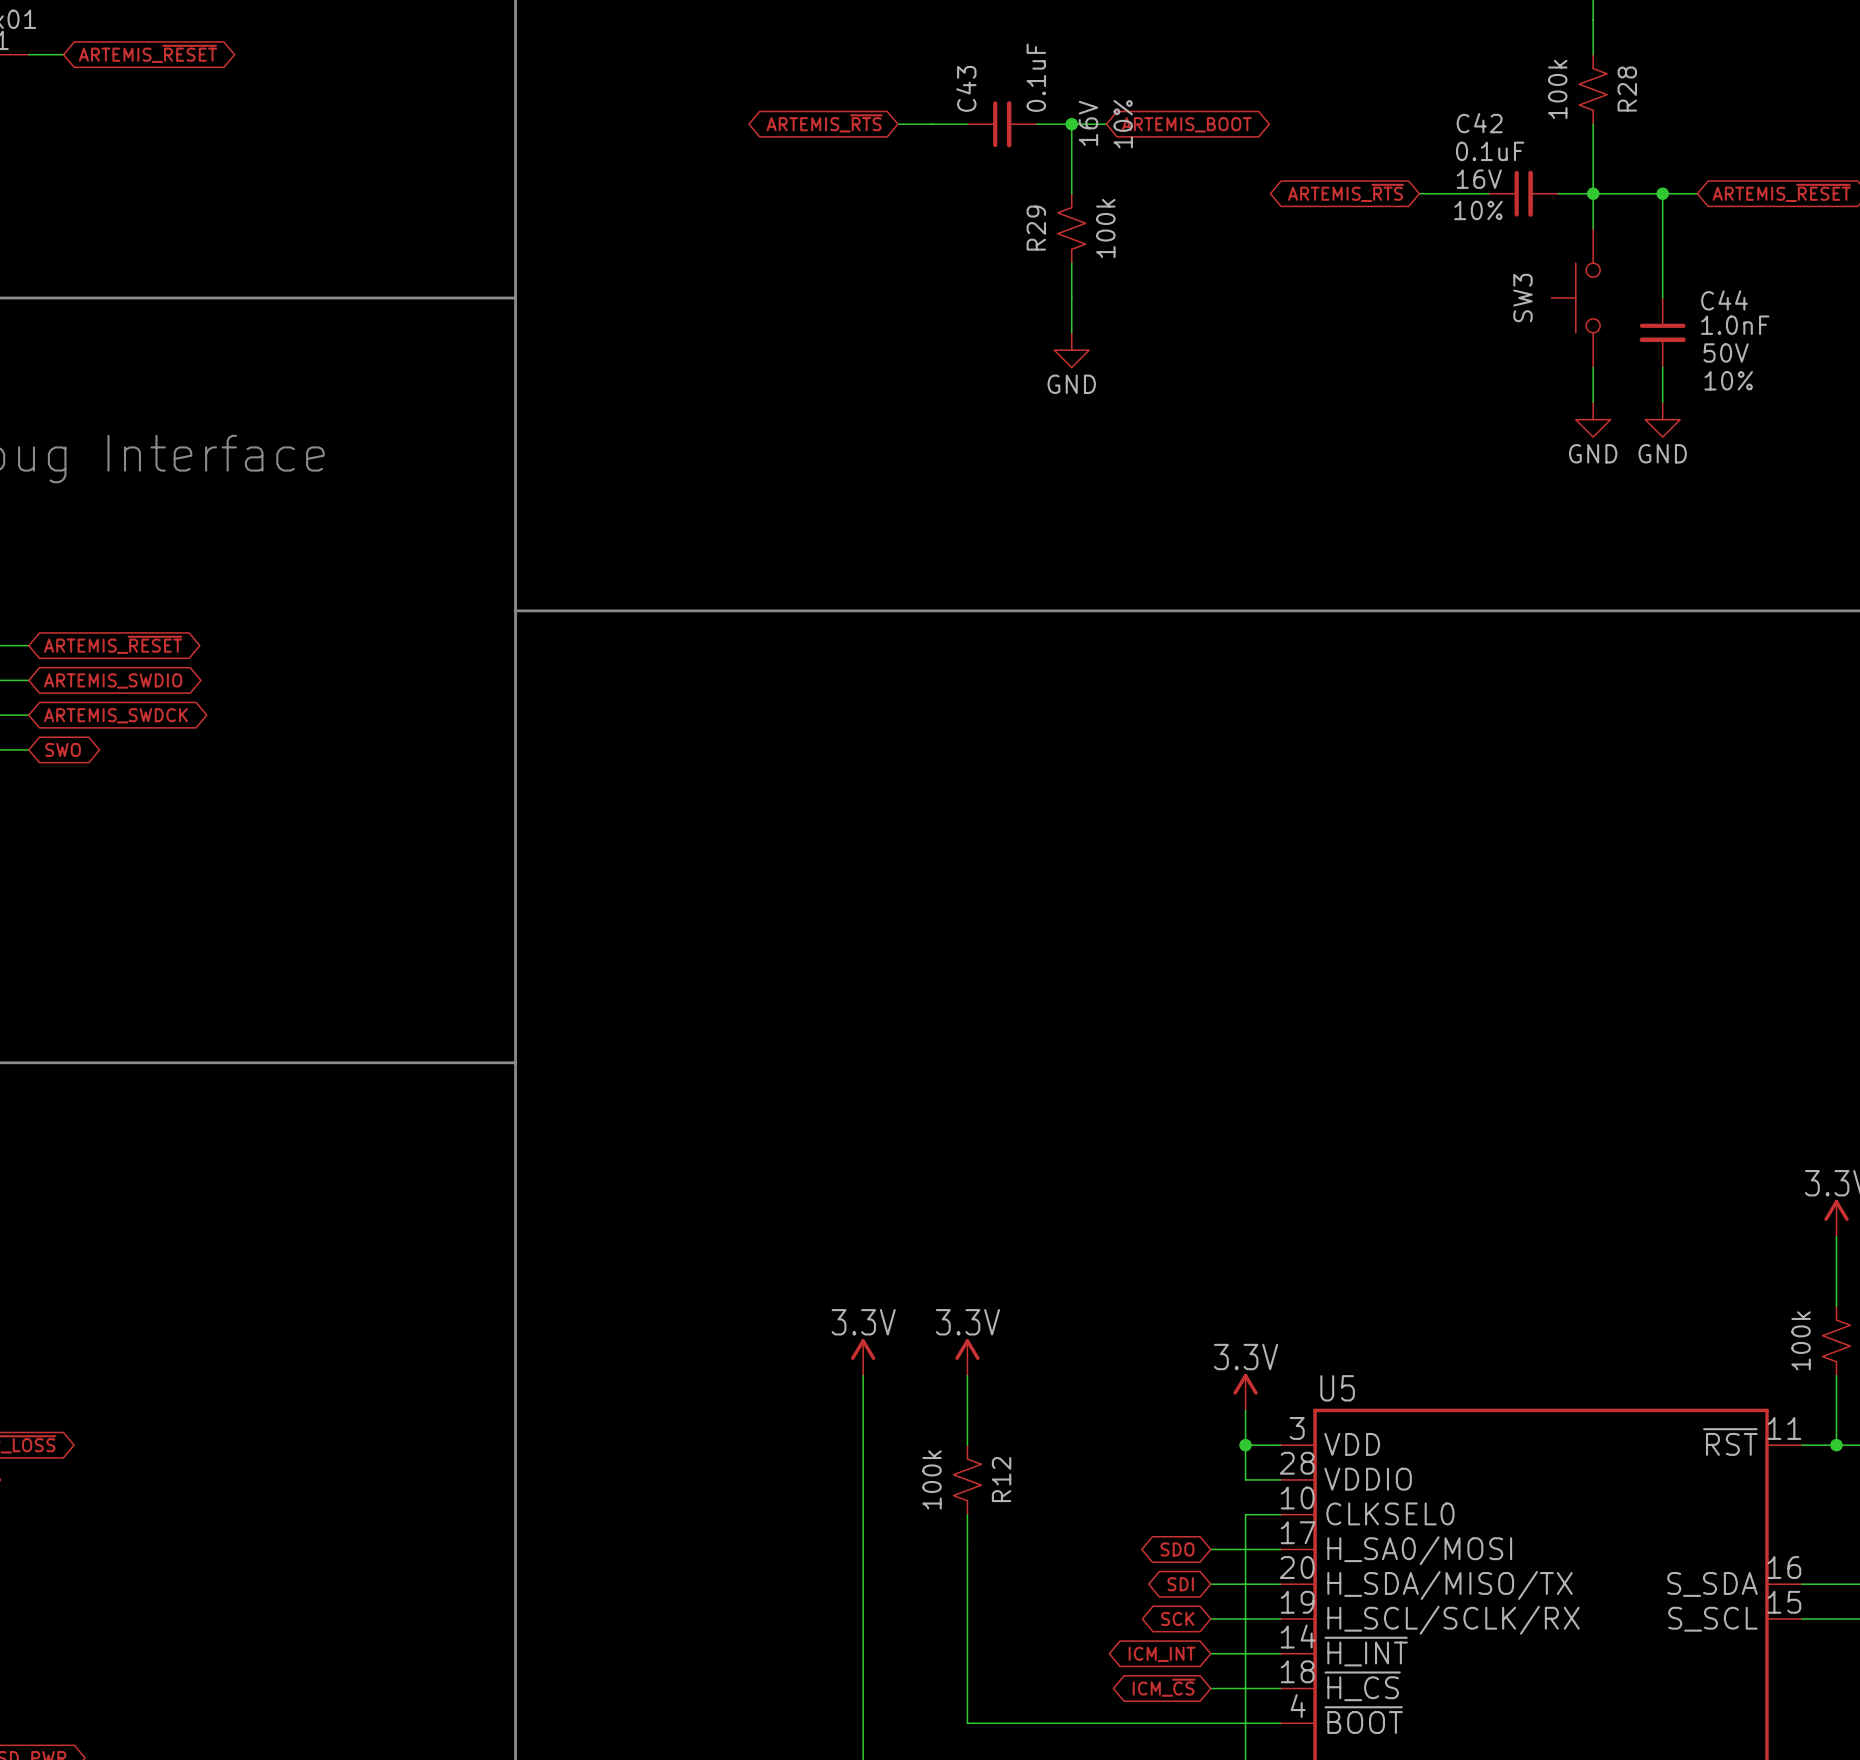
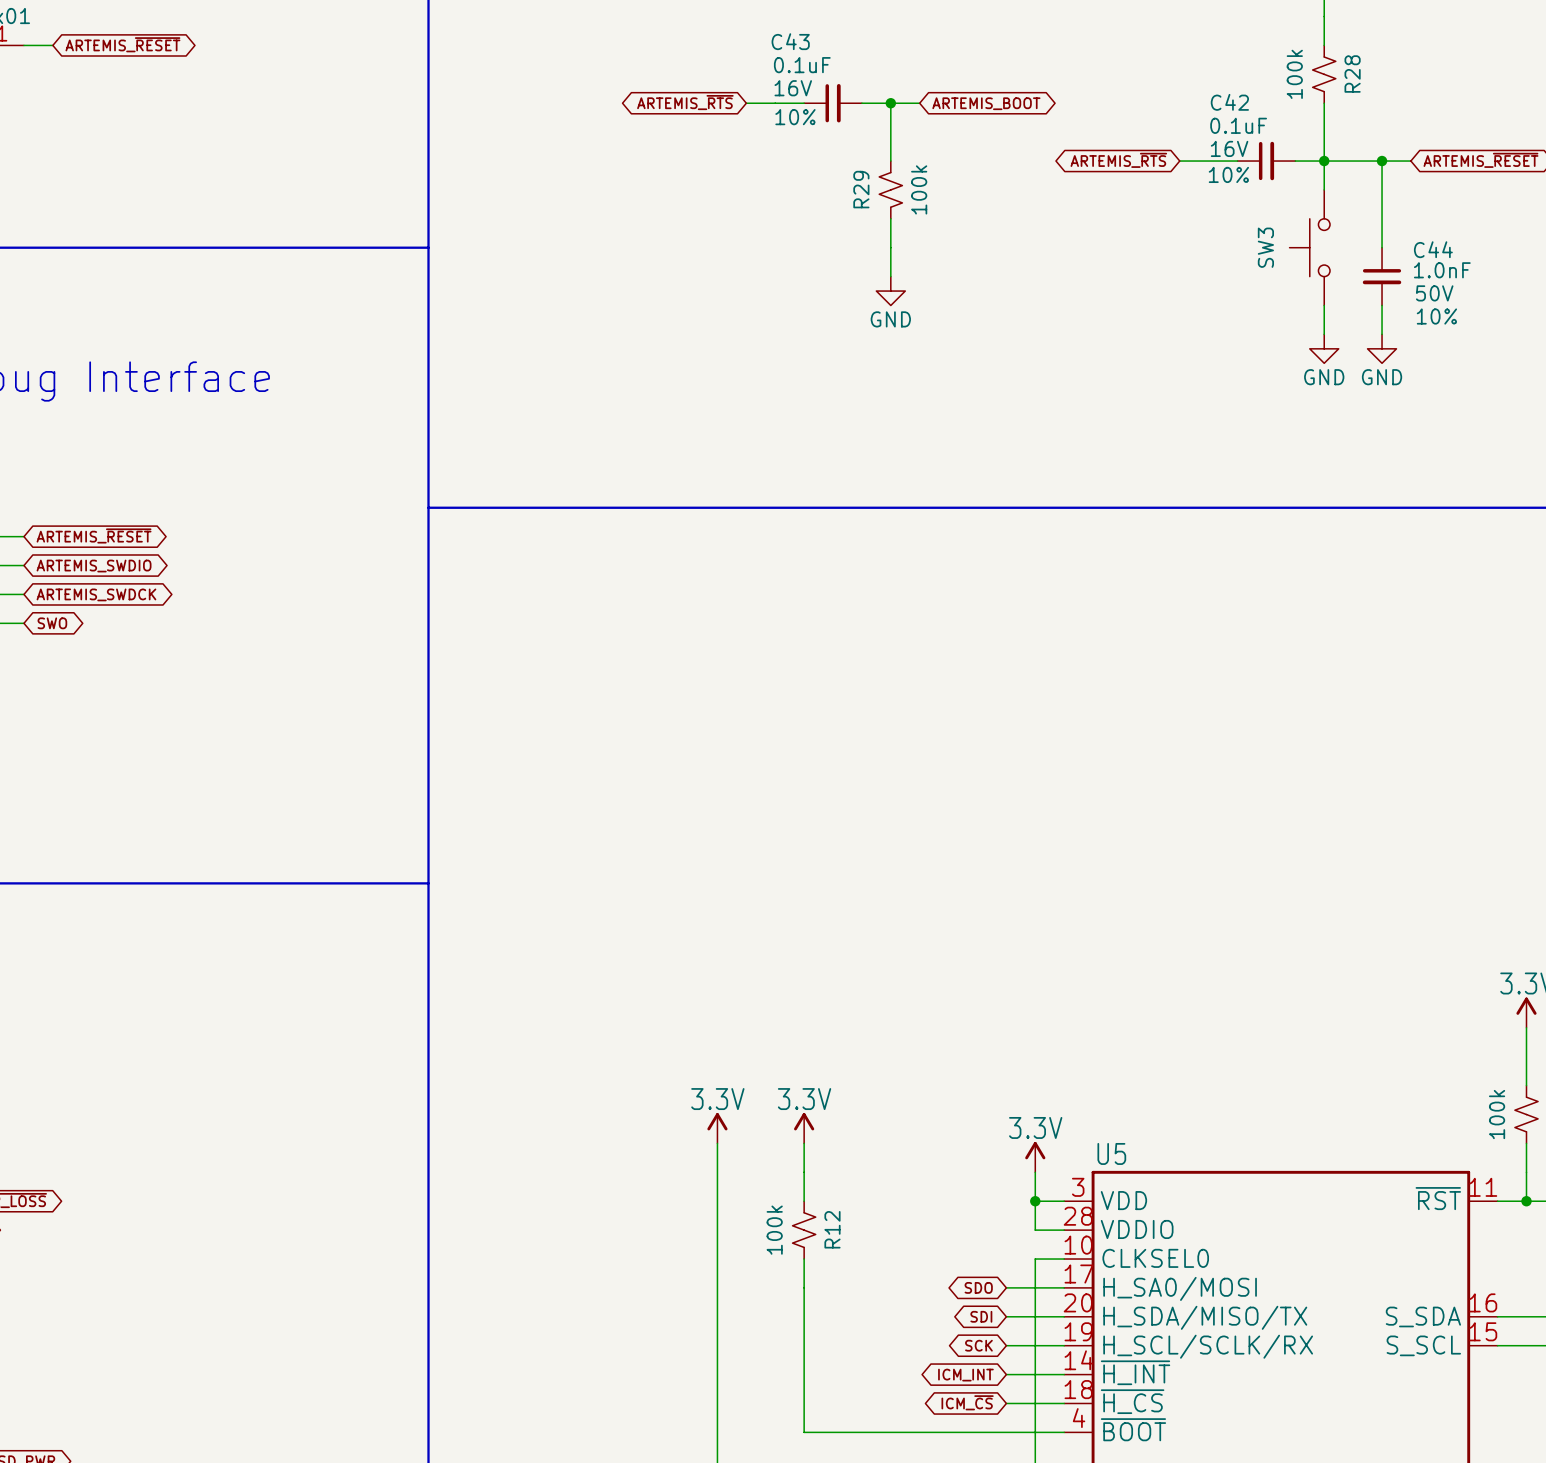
C43 value rotation: 0° (1036, 77) -> 90° clockwise (802, 65)
C43 name rotation: 0° (966, 88) -> 90° clockwise (790, 41)
C43 text rotation: 0° (1088, 123) -> 90° clockwise (793, 88)
C43 text position: 16V (1088, 123) -> 16V (793, 88)
C43 text rotation: 0° (1123, 124) -> 90° clockwise (795, 117)
C43 text position: 10% (1123, 124) -> 10% (795, 117)

